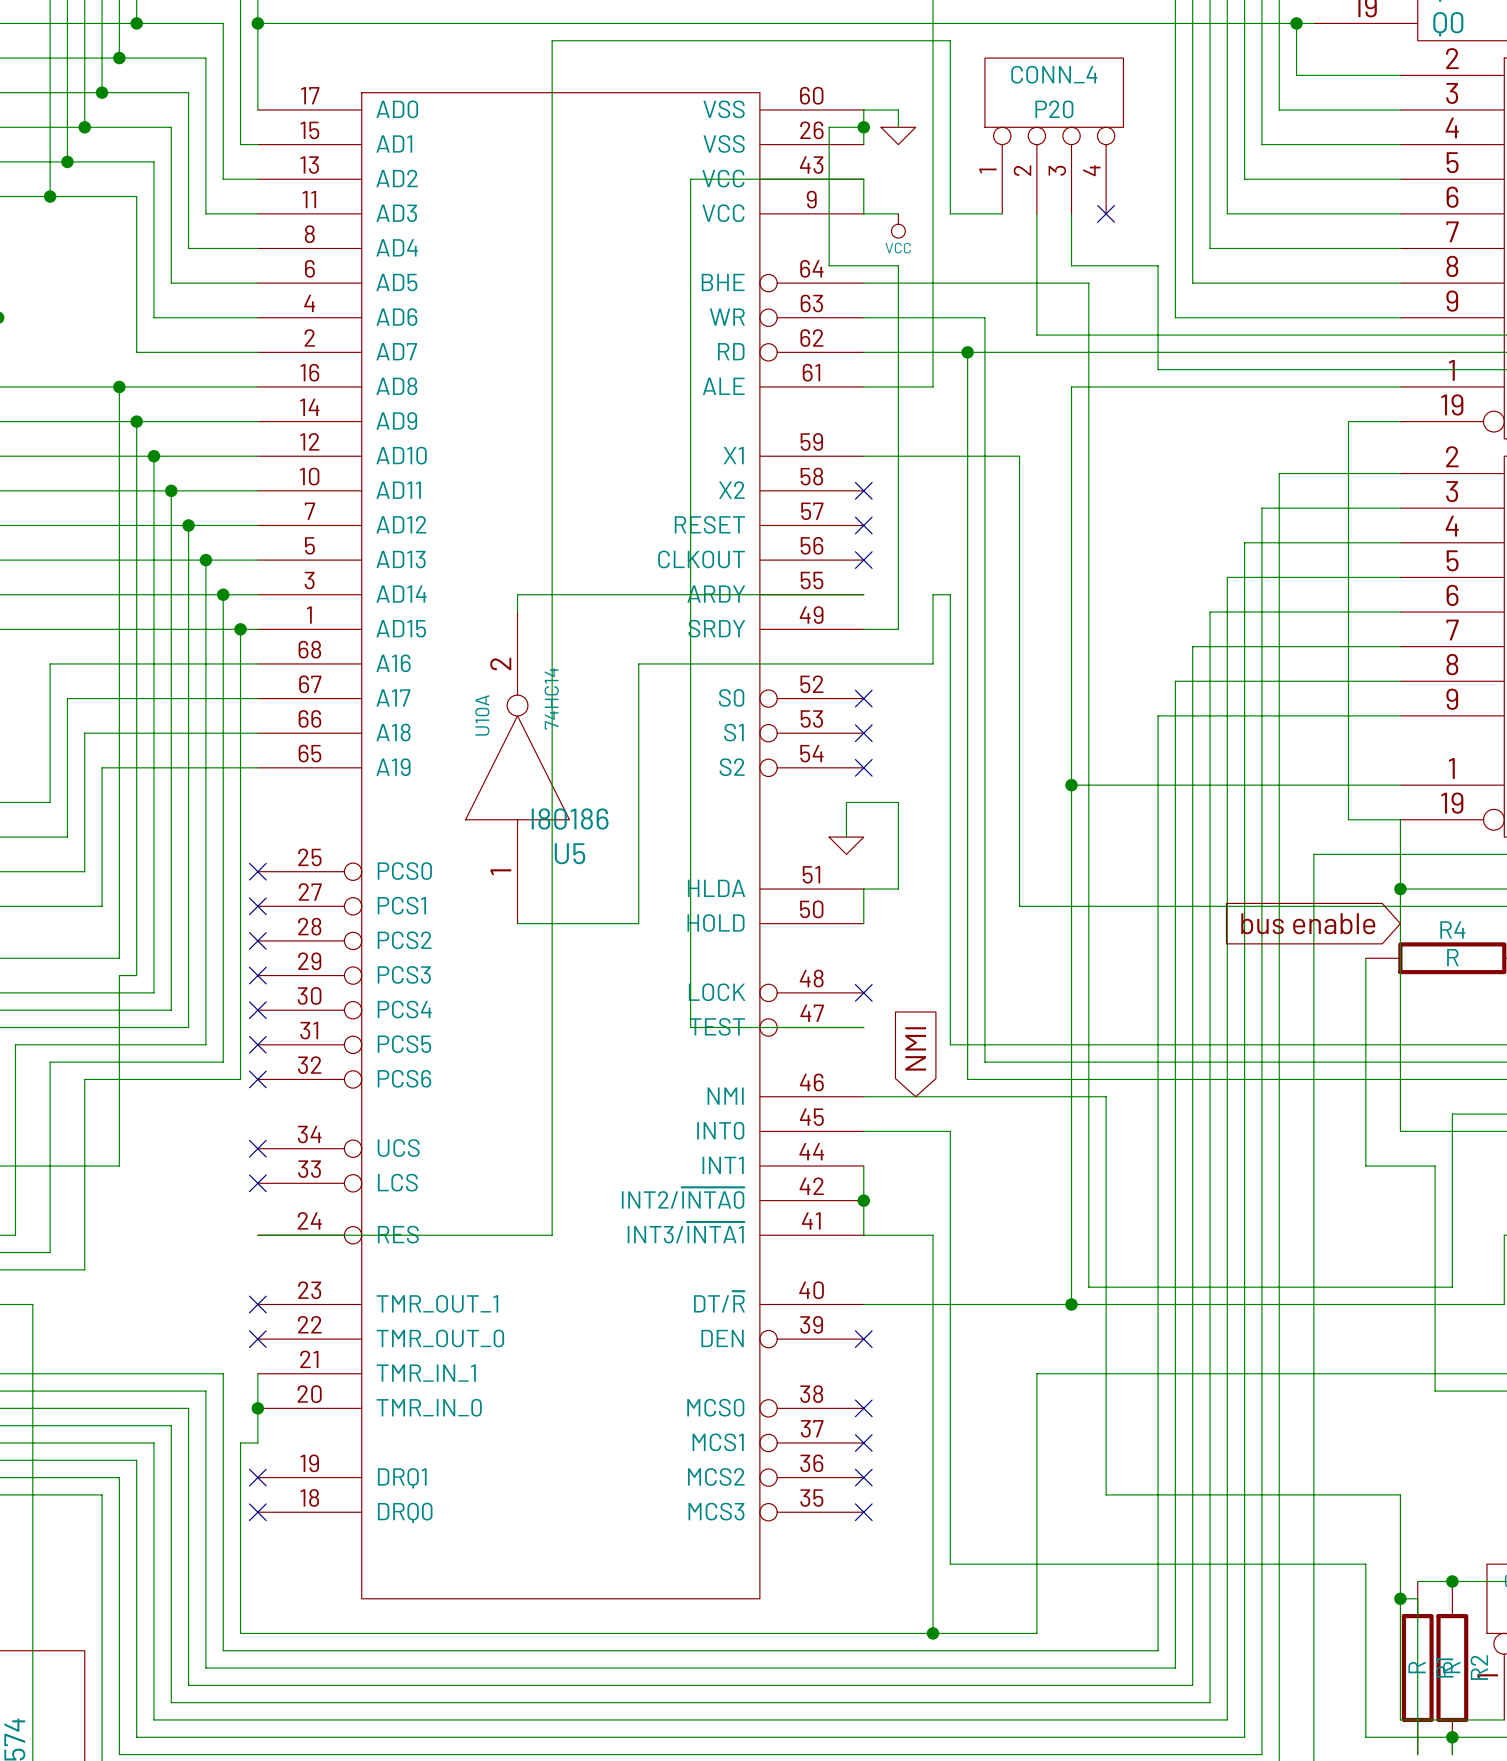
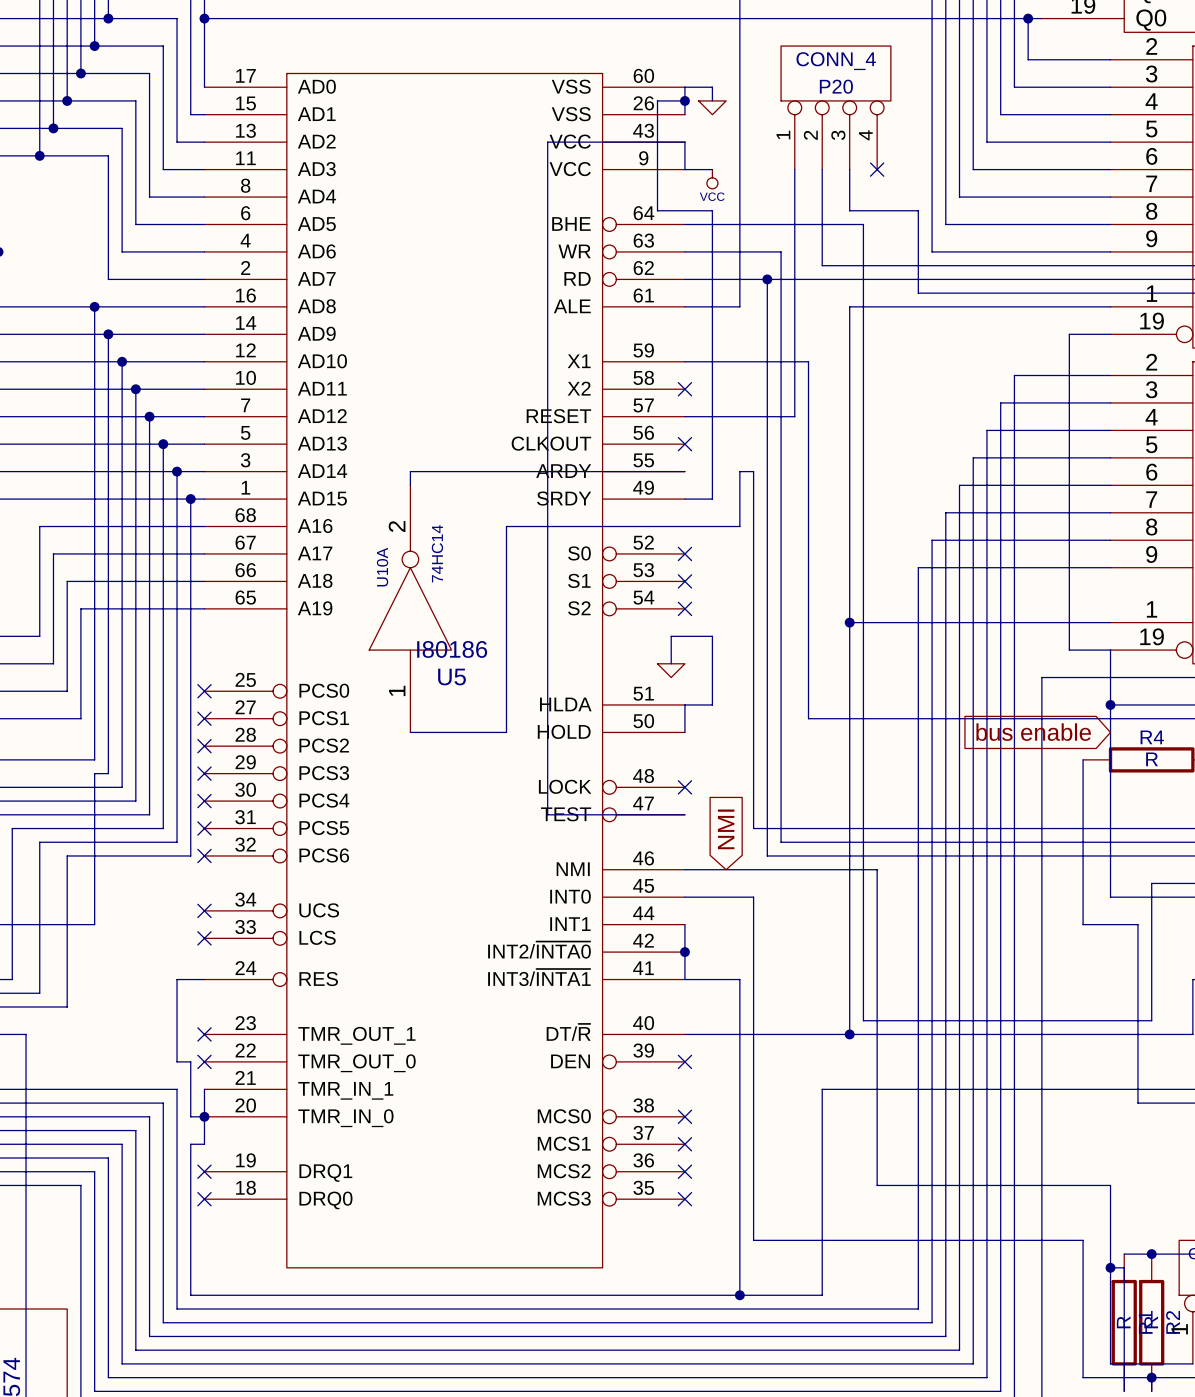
wire: (1002, 213) (950, 213) (950, 40) (552, 40) (552, 1235) (257, 1235) -> (794, 169) (794, 416) (684, 416)
no-connect mark: (863, 525) -> none
wire: none -> (204, 979) (177, 979) (177, 1061) (190, 1061) (190, 1116) (204, 1116)

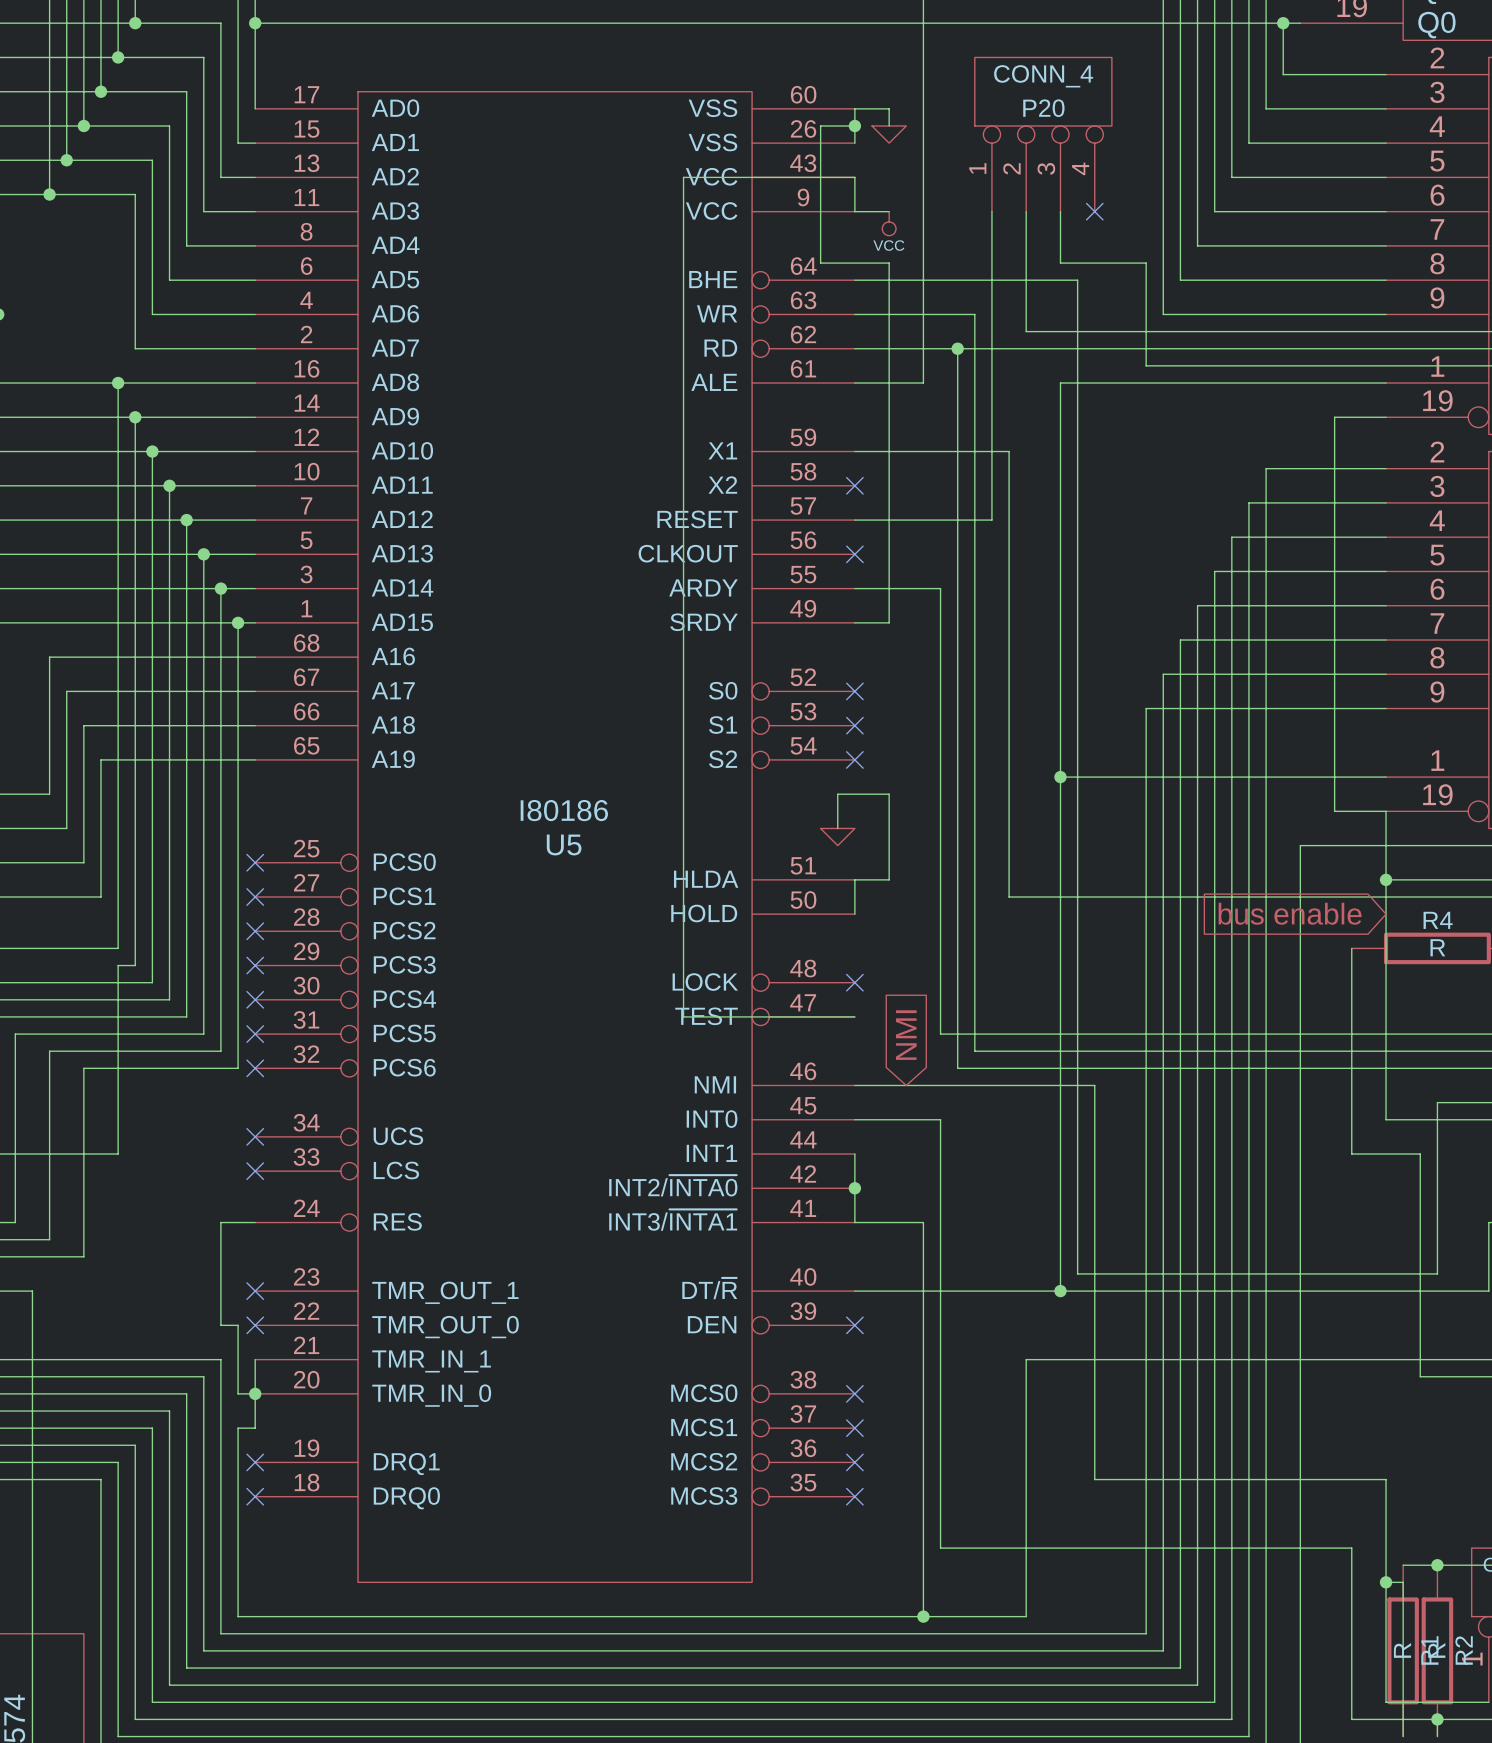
wire: (684, 471) (410, 471) (410, 485) -> (854, 588) (923, 588)
wire: (739, 471) (739, 526) (506, 526) (506, 732) (410, 732) -> none
U10A: 74HC14 (410, 608) -> none

